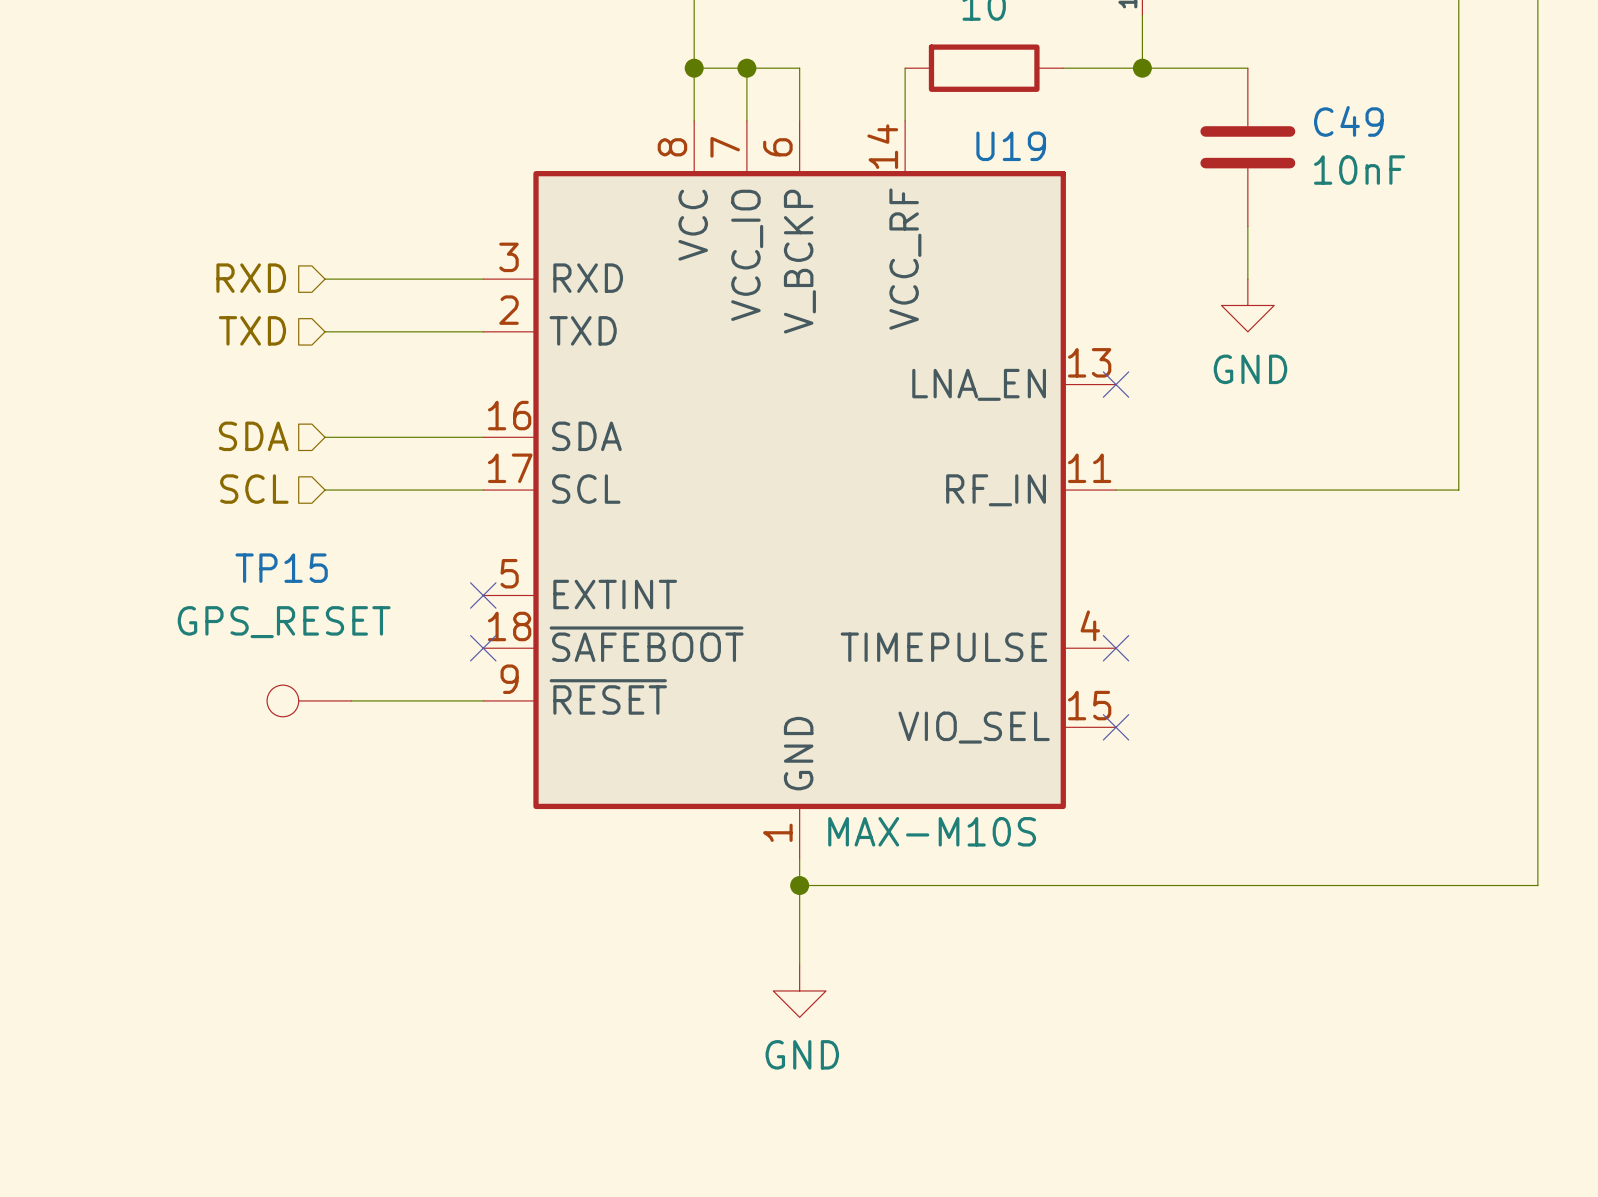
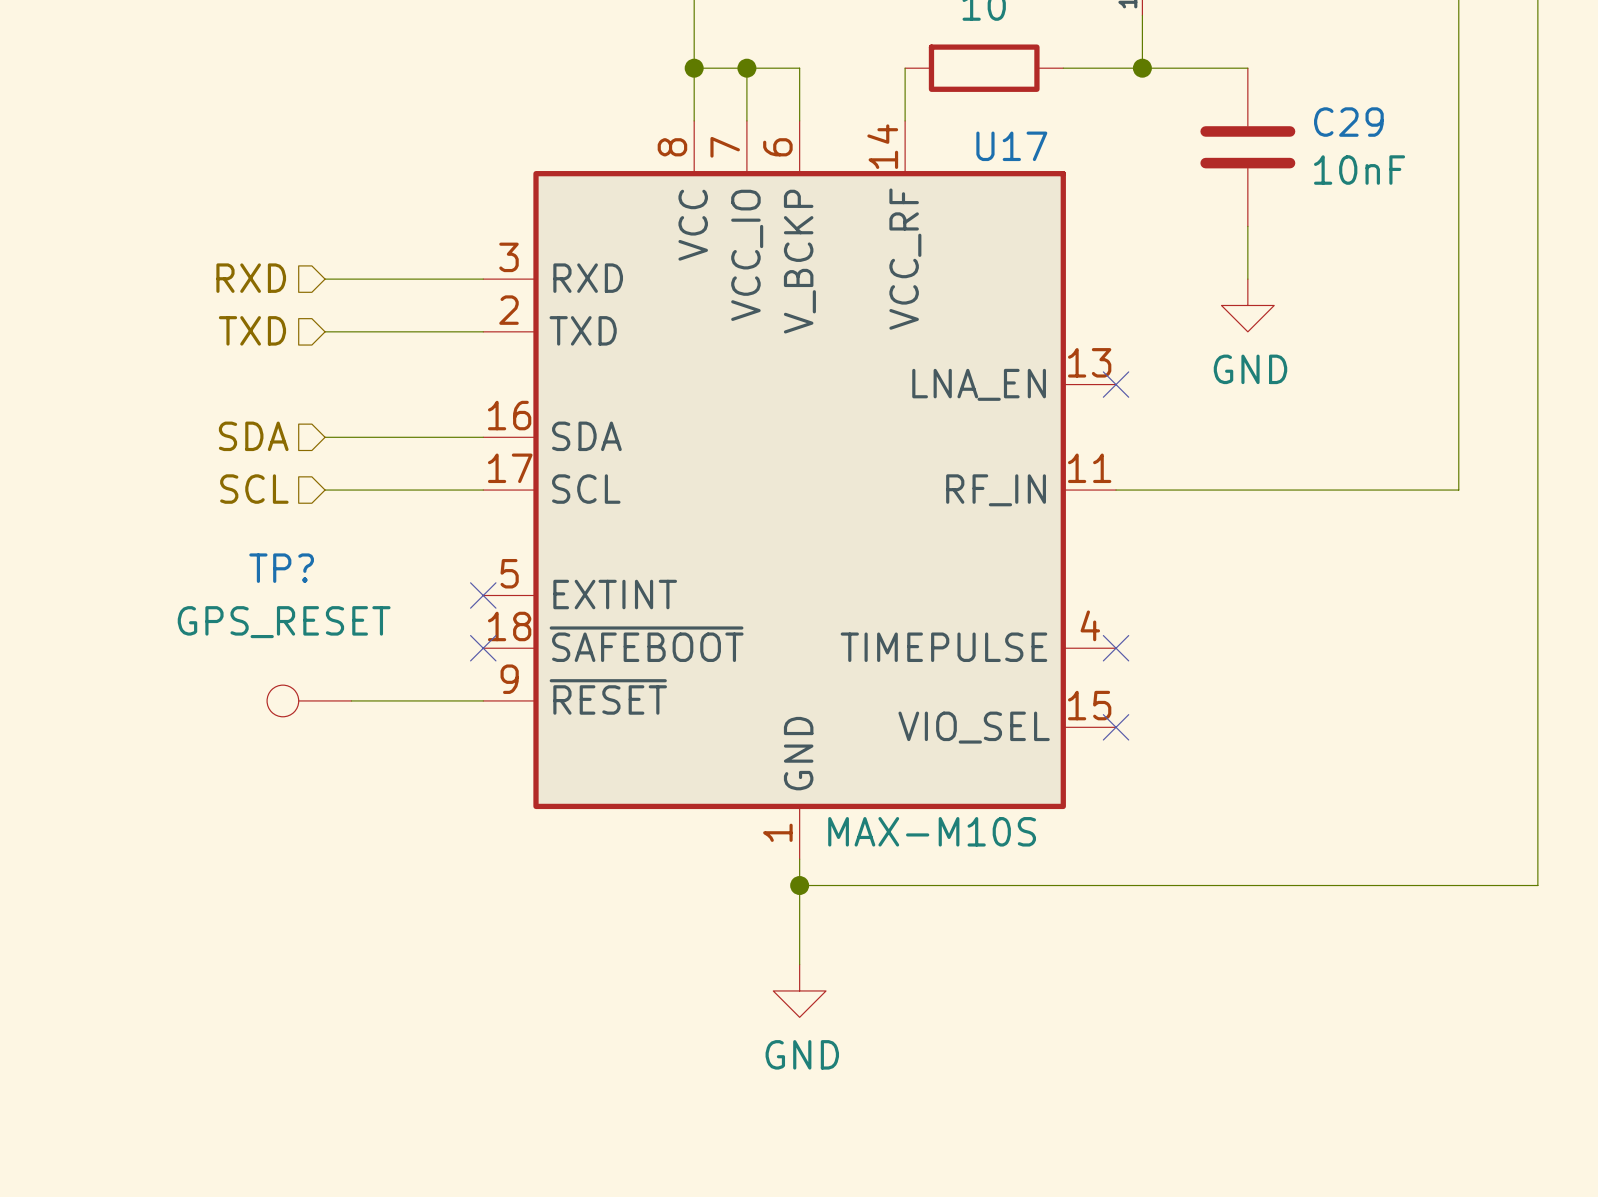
C49 name: C49 (1348, 121) -> C29 (1348, 122)
U19 name: U19 (1011, 146) -> U17 (1011, 146)
TP15 name: TP15 (281, 568) -> TP? (281, 568)

